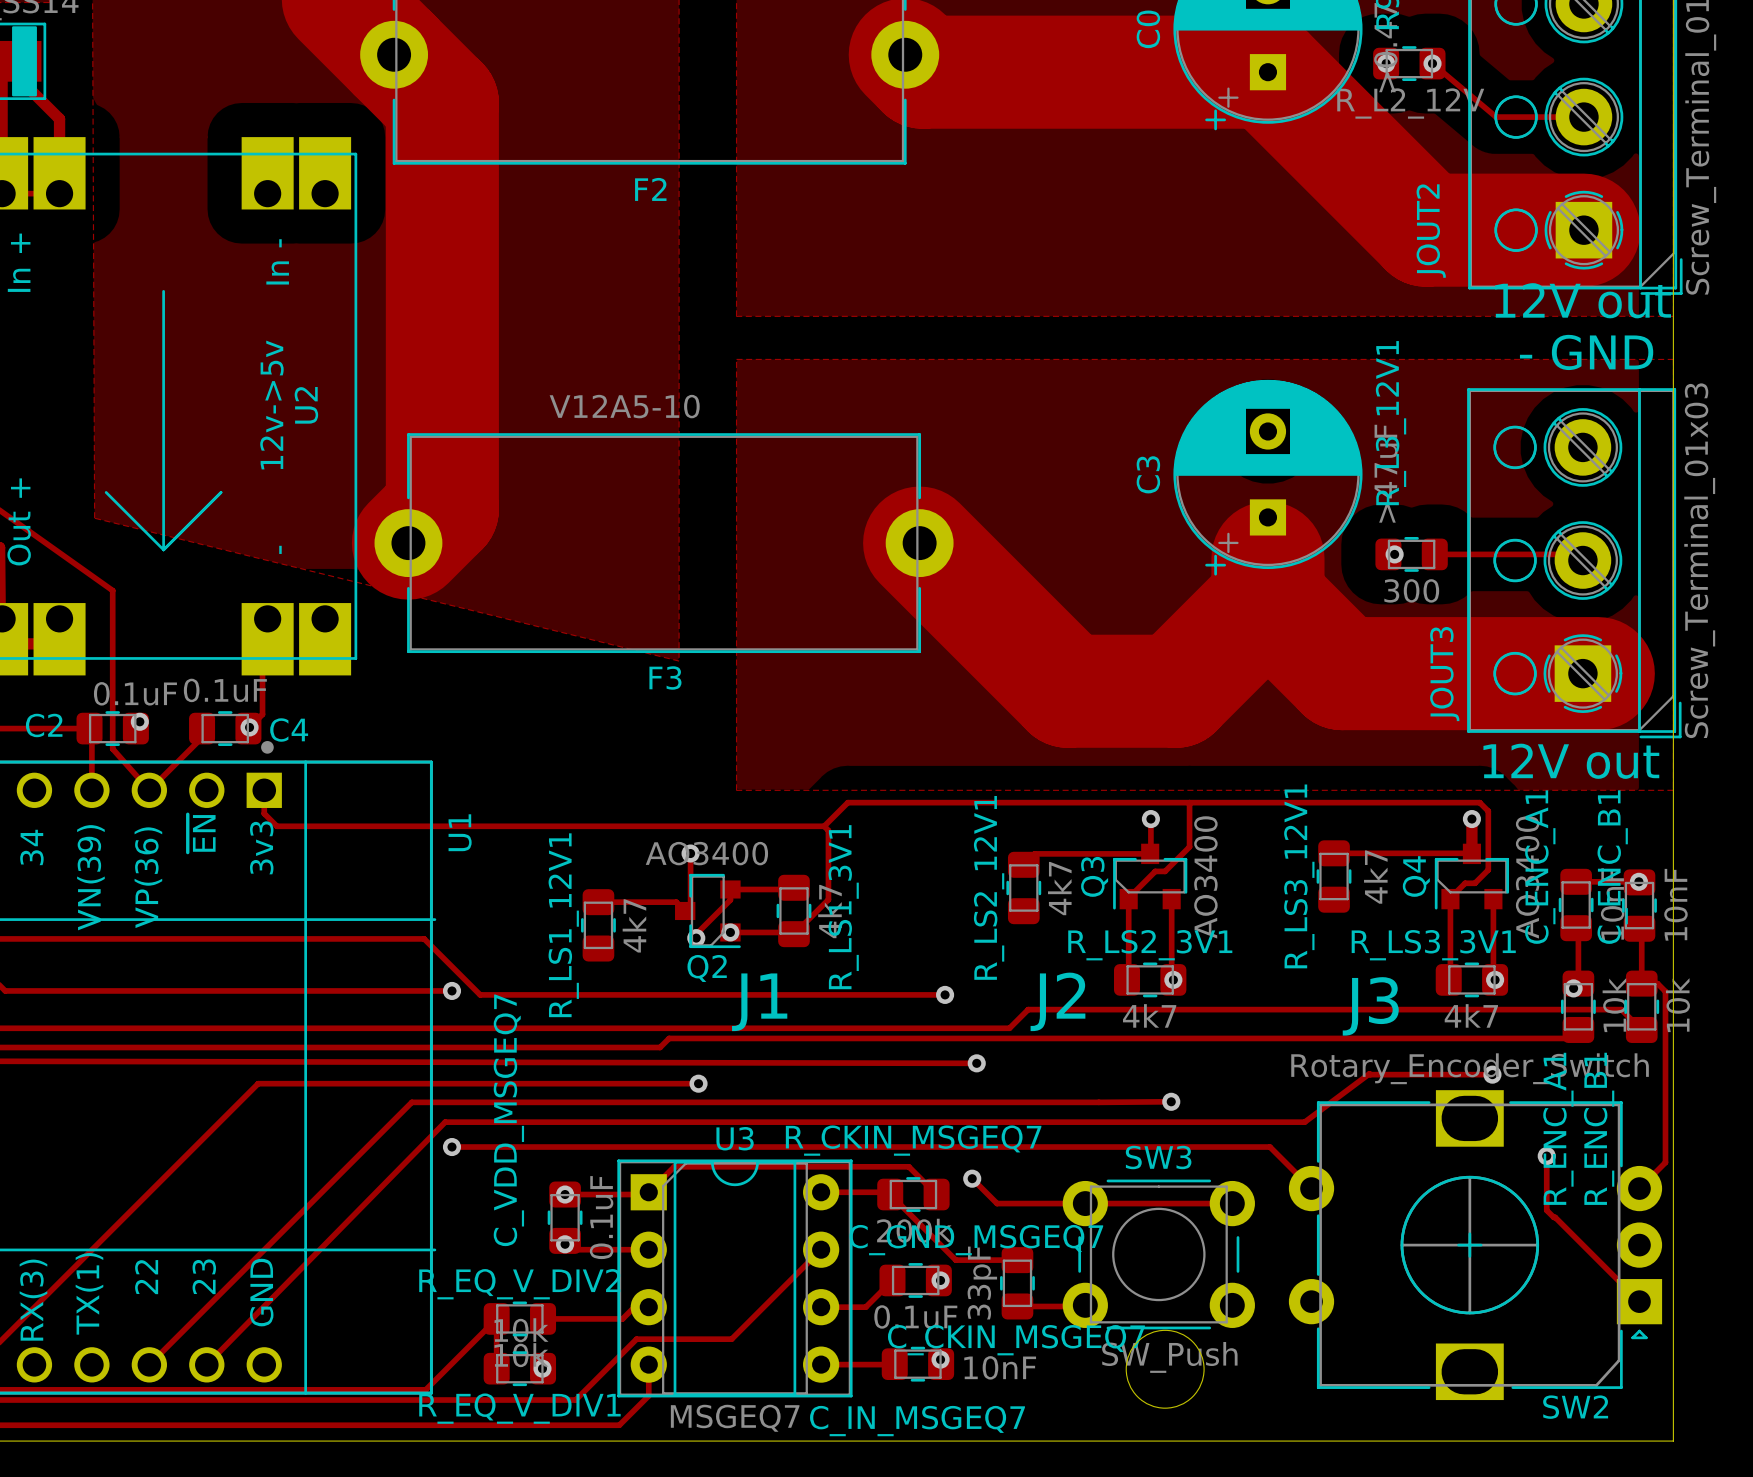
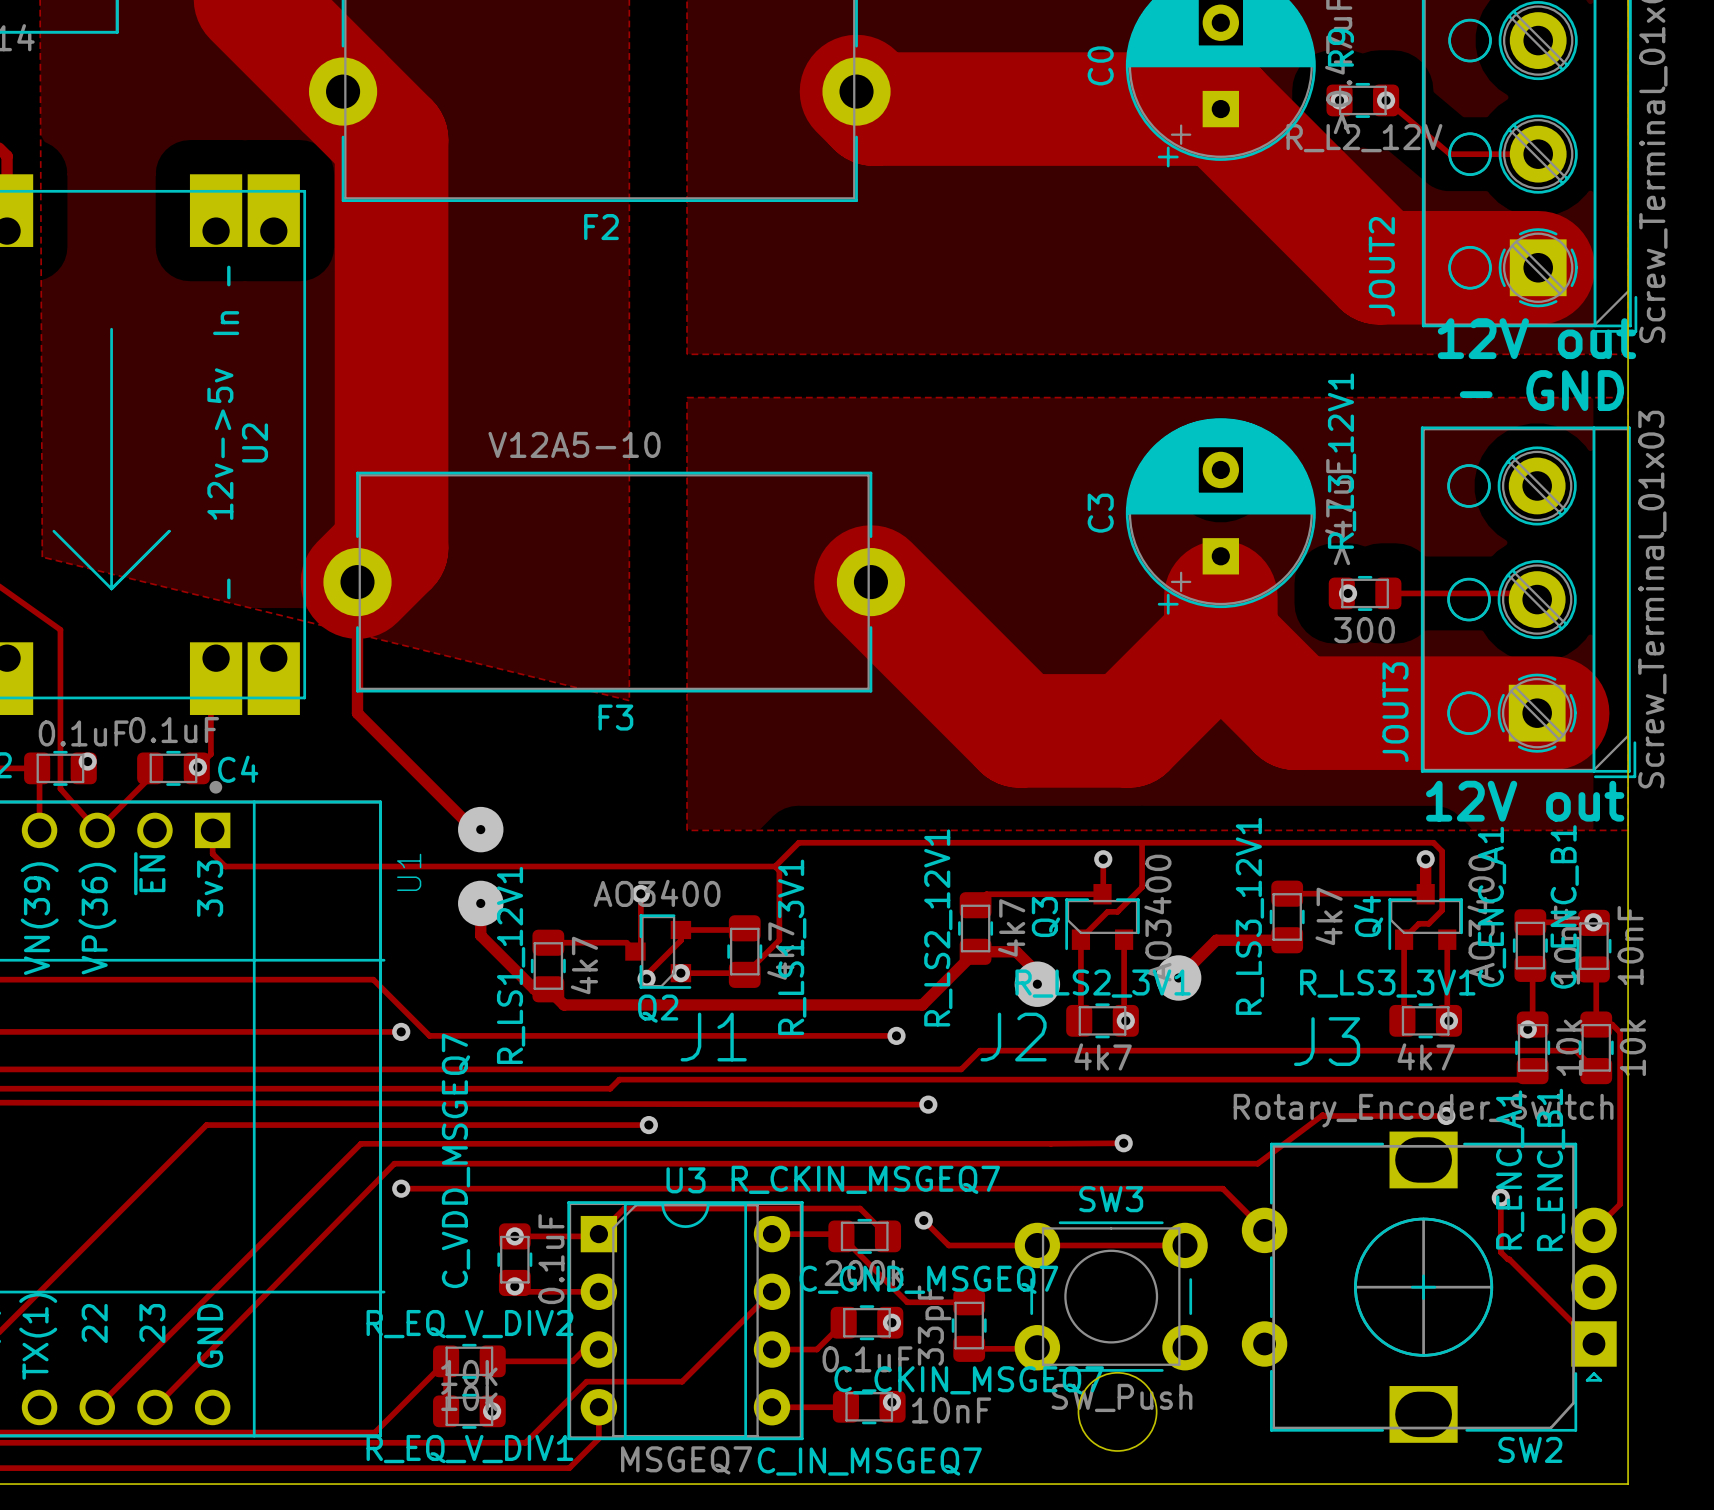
track: none -> (357, 582) (357, 713) (473, 829) (480, 829)
via: none -> (480, 829)
track: none -> (480, 903) (480, 935) (534, 989) (548, 989) (564, 1004) (922, 1004) (975, 951) (1016, 951) (1048, 984)
via: none -> (480, 903)
track: none -> (1287, 940) (1216, 940) (1178, 977)
via: none -> (1178, 977)
via: none -> (1037, 984)

